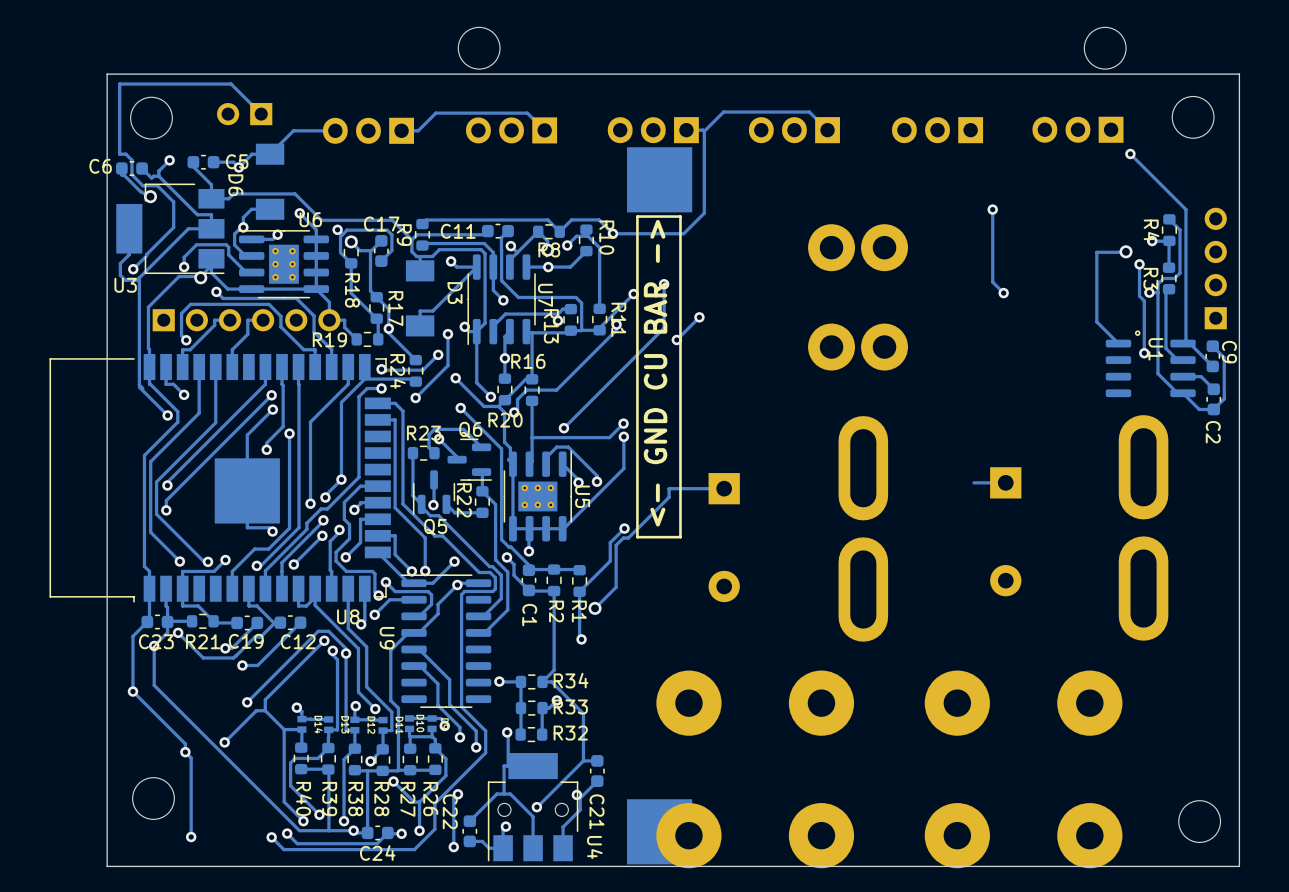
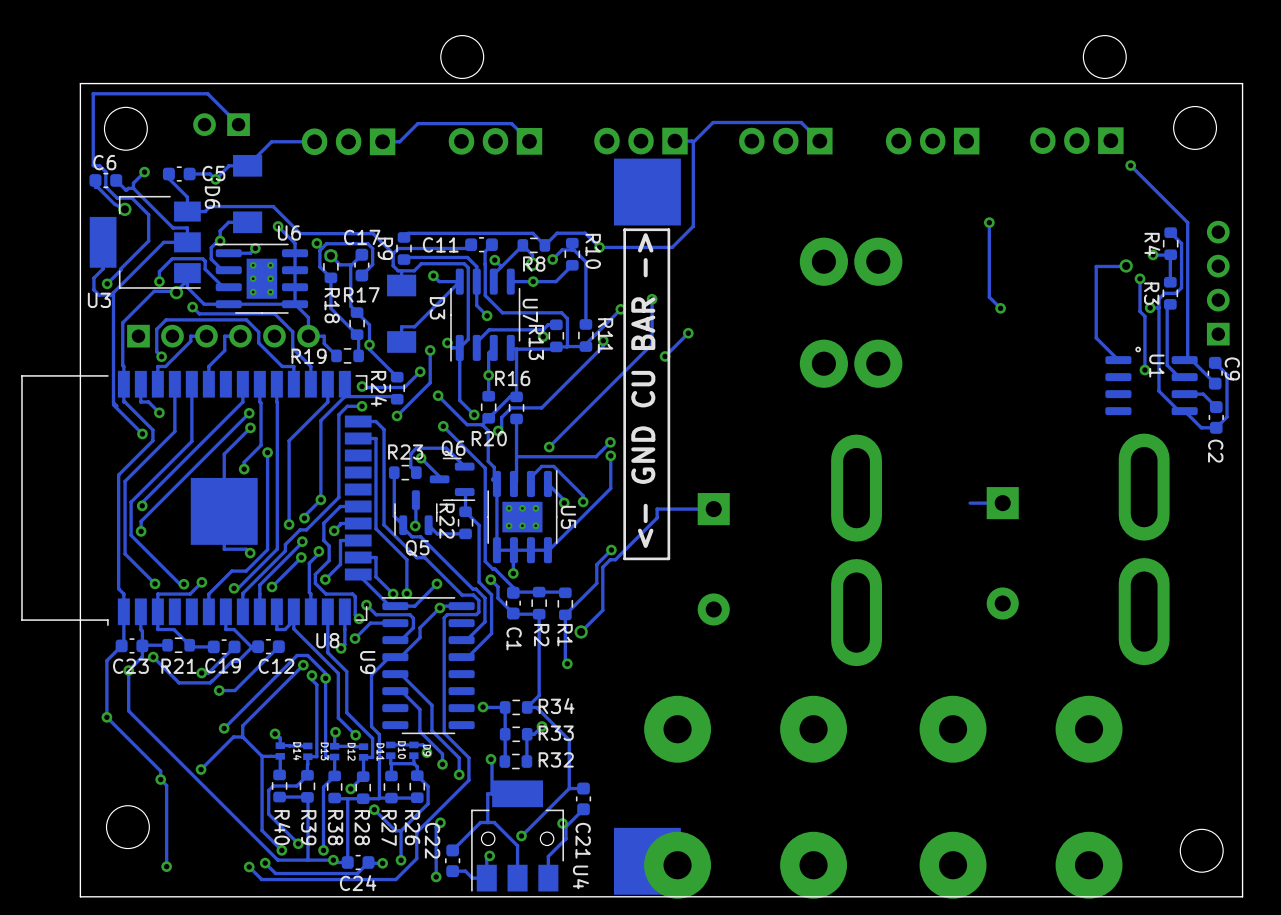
C6 name position: C6 (100, 166) -> C6 (104, 162)
R17 name rotation: 0° (395, 308) -> 90° counterclockwise (361, 294)

